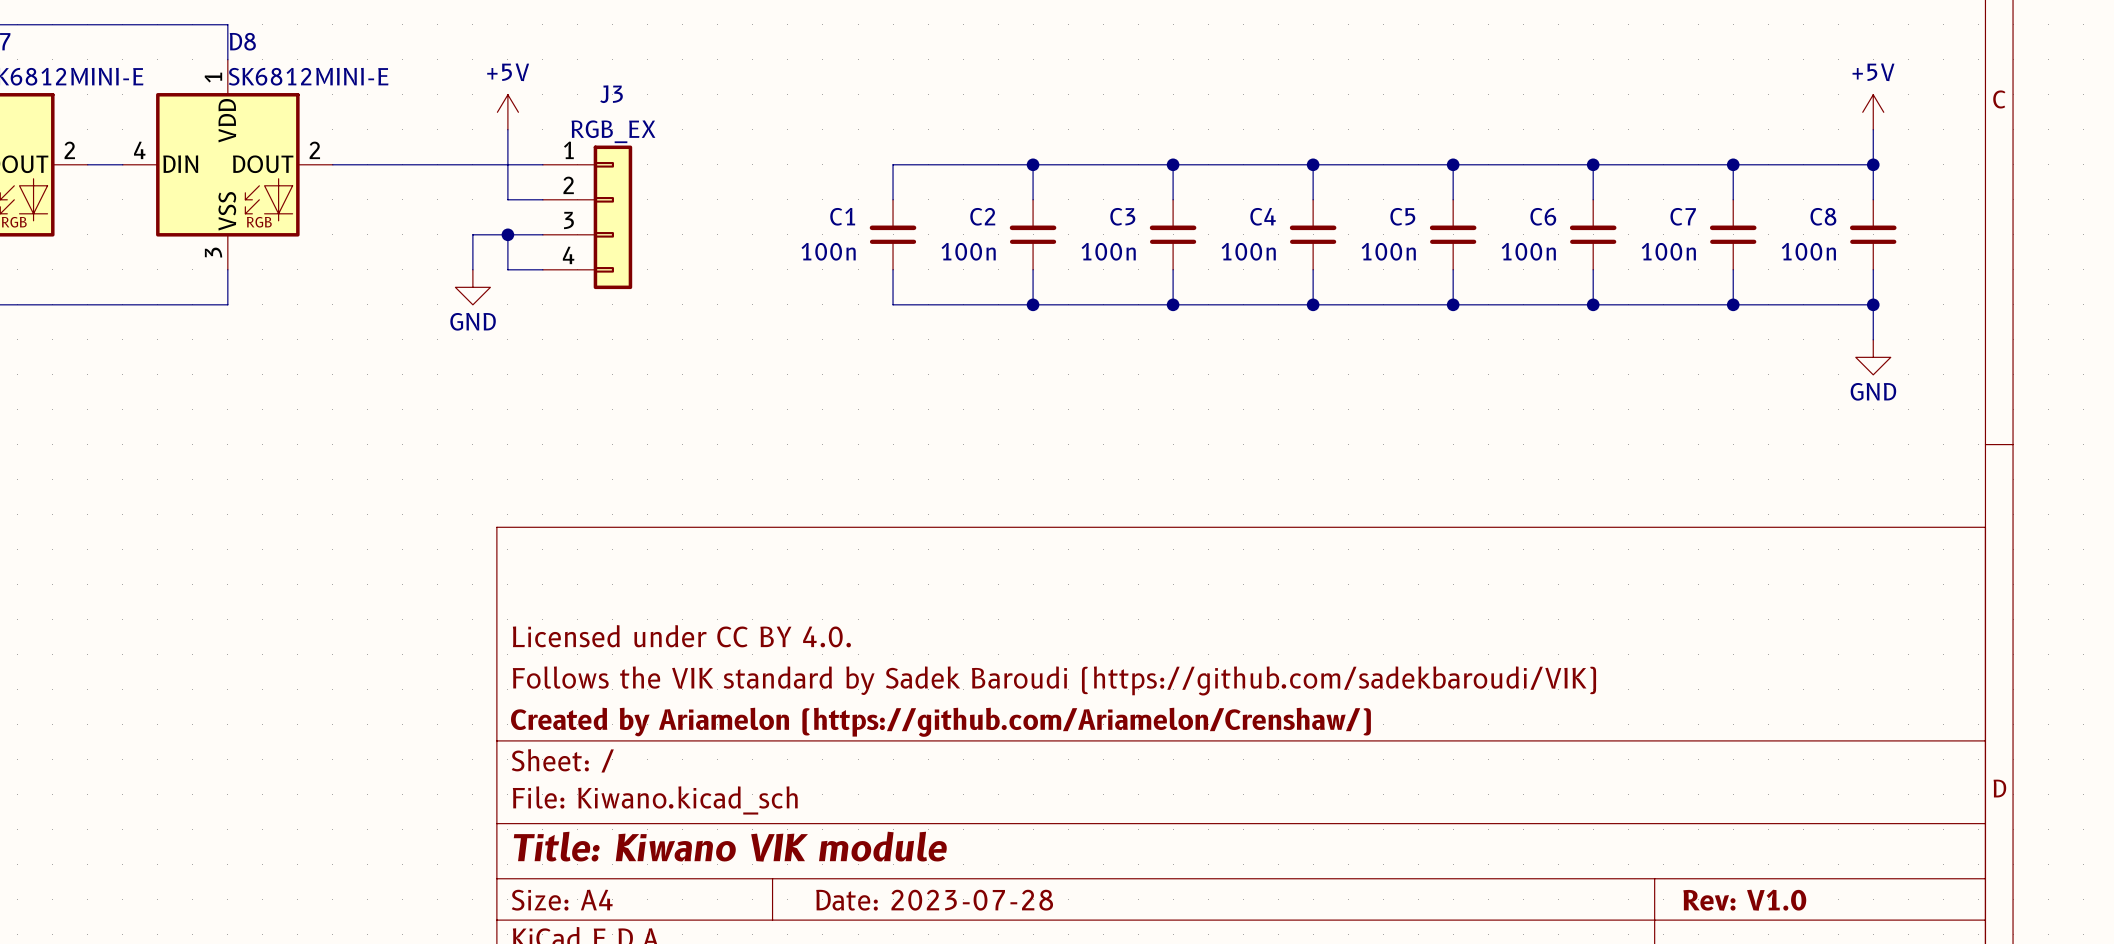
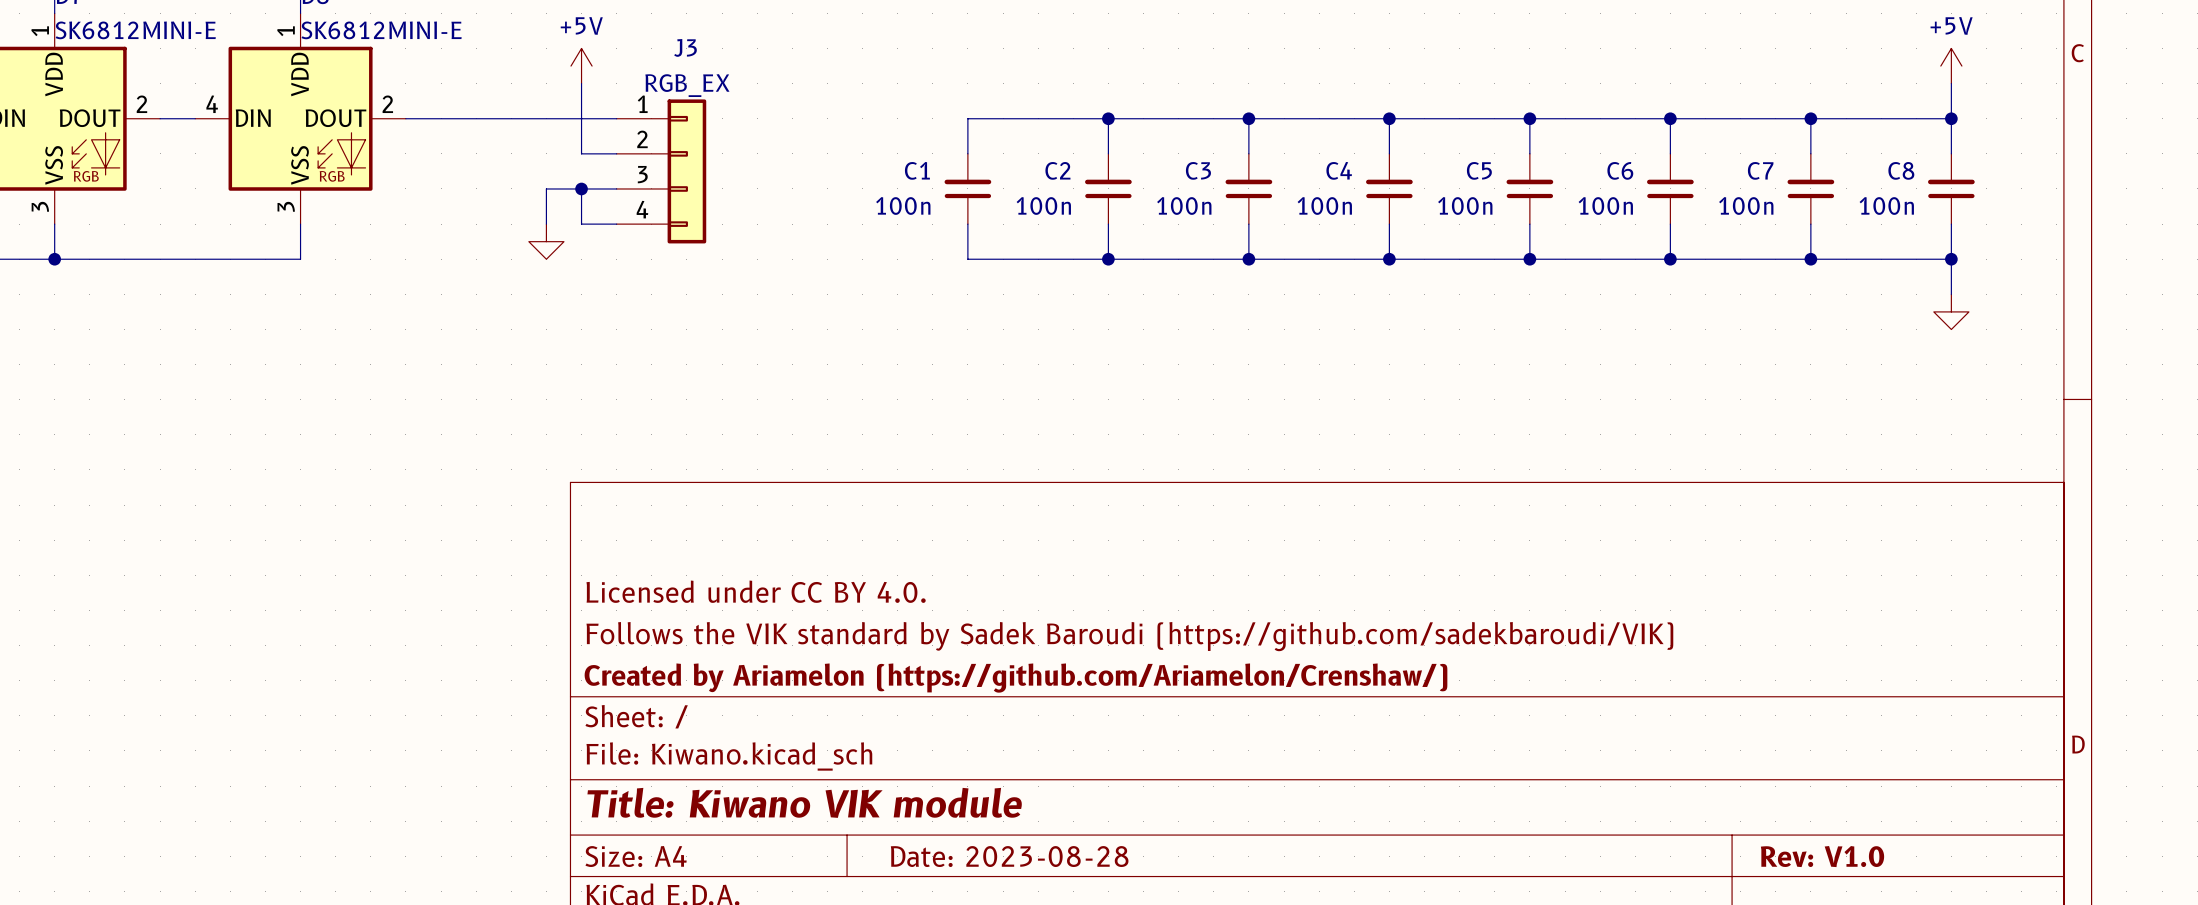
power symbol text: GND (473, 321) -> none
power symbol text: GND (1873, 391) -> none
title block: Date: 2023-07-28 (934, 900) -> Date: 2023-08-28 (1009, 856)

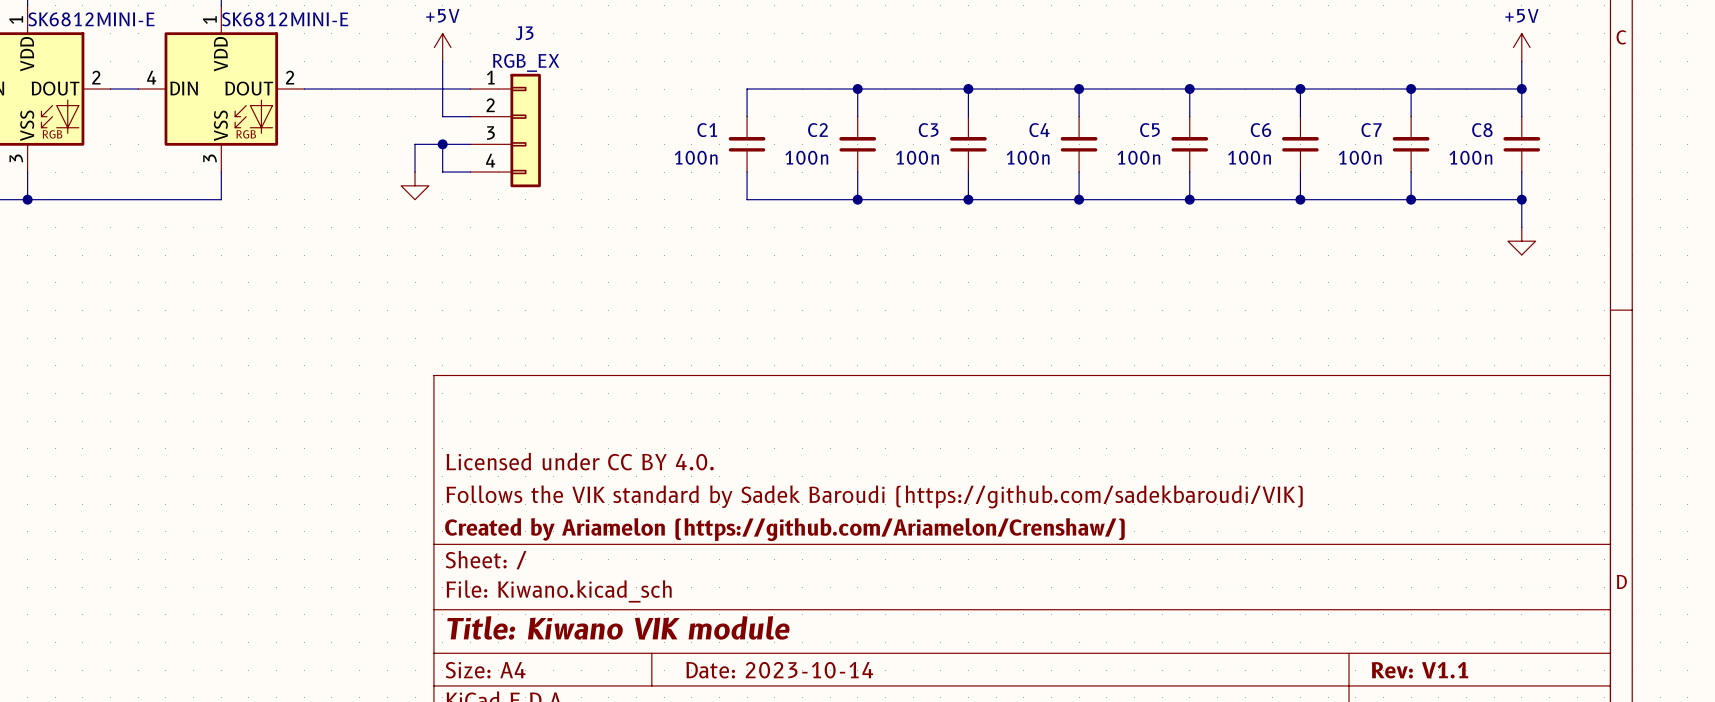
title block: Date: 2023-08-28 (1009, 856) -> Date: 2023-10-14 (779, 670)
title block: Rev: V1.0 (1822, 856) -> Rev: V1.1 (1419, 670)

